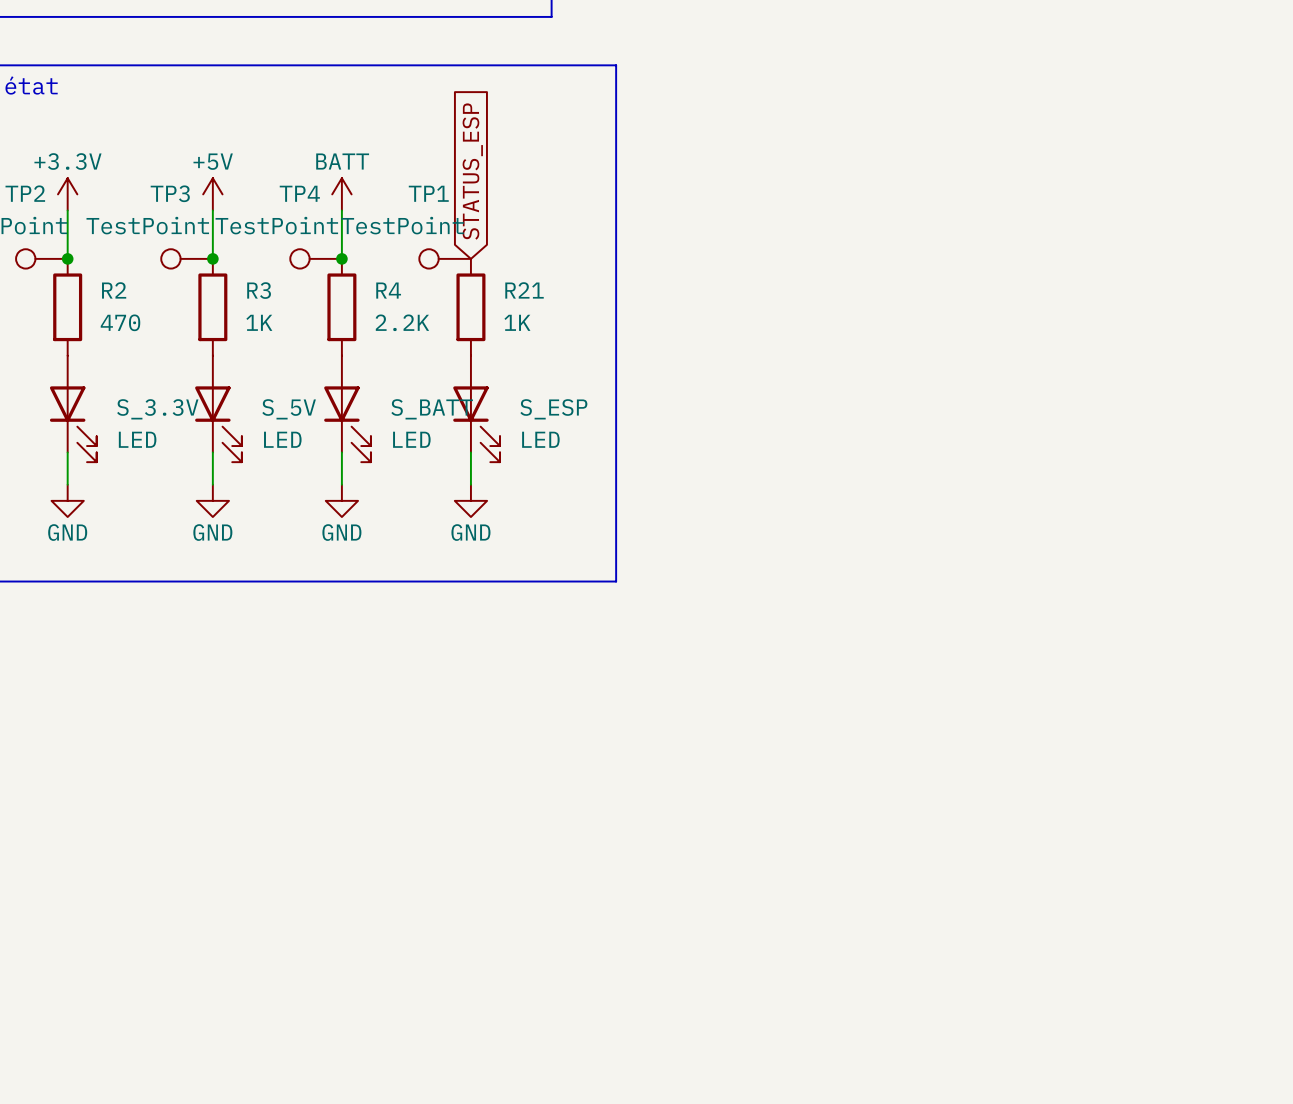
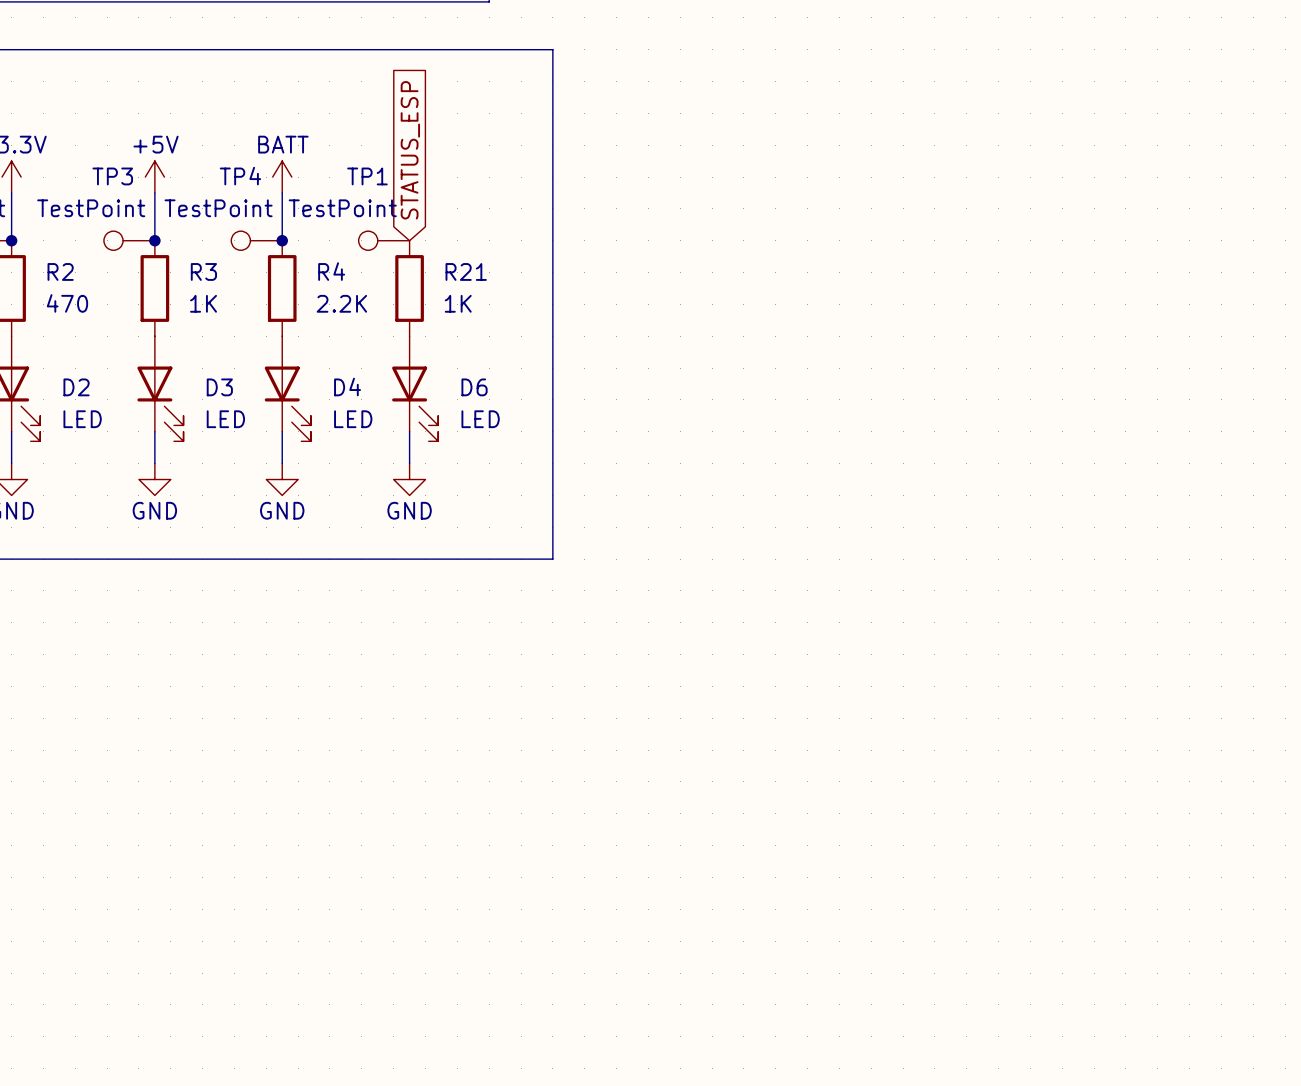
S_3.3V name: S_3.3V (157, 409) -> D2 (76, 387)
S_5V name: S_5V (289, 409) -> D3 (219, 387)
S_BATT name: S_BATT (432, 409) -> D4 (347, 387)
S_ESP name: S_ESP (553, 409) -> D6 (474, 387)

